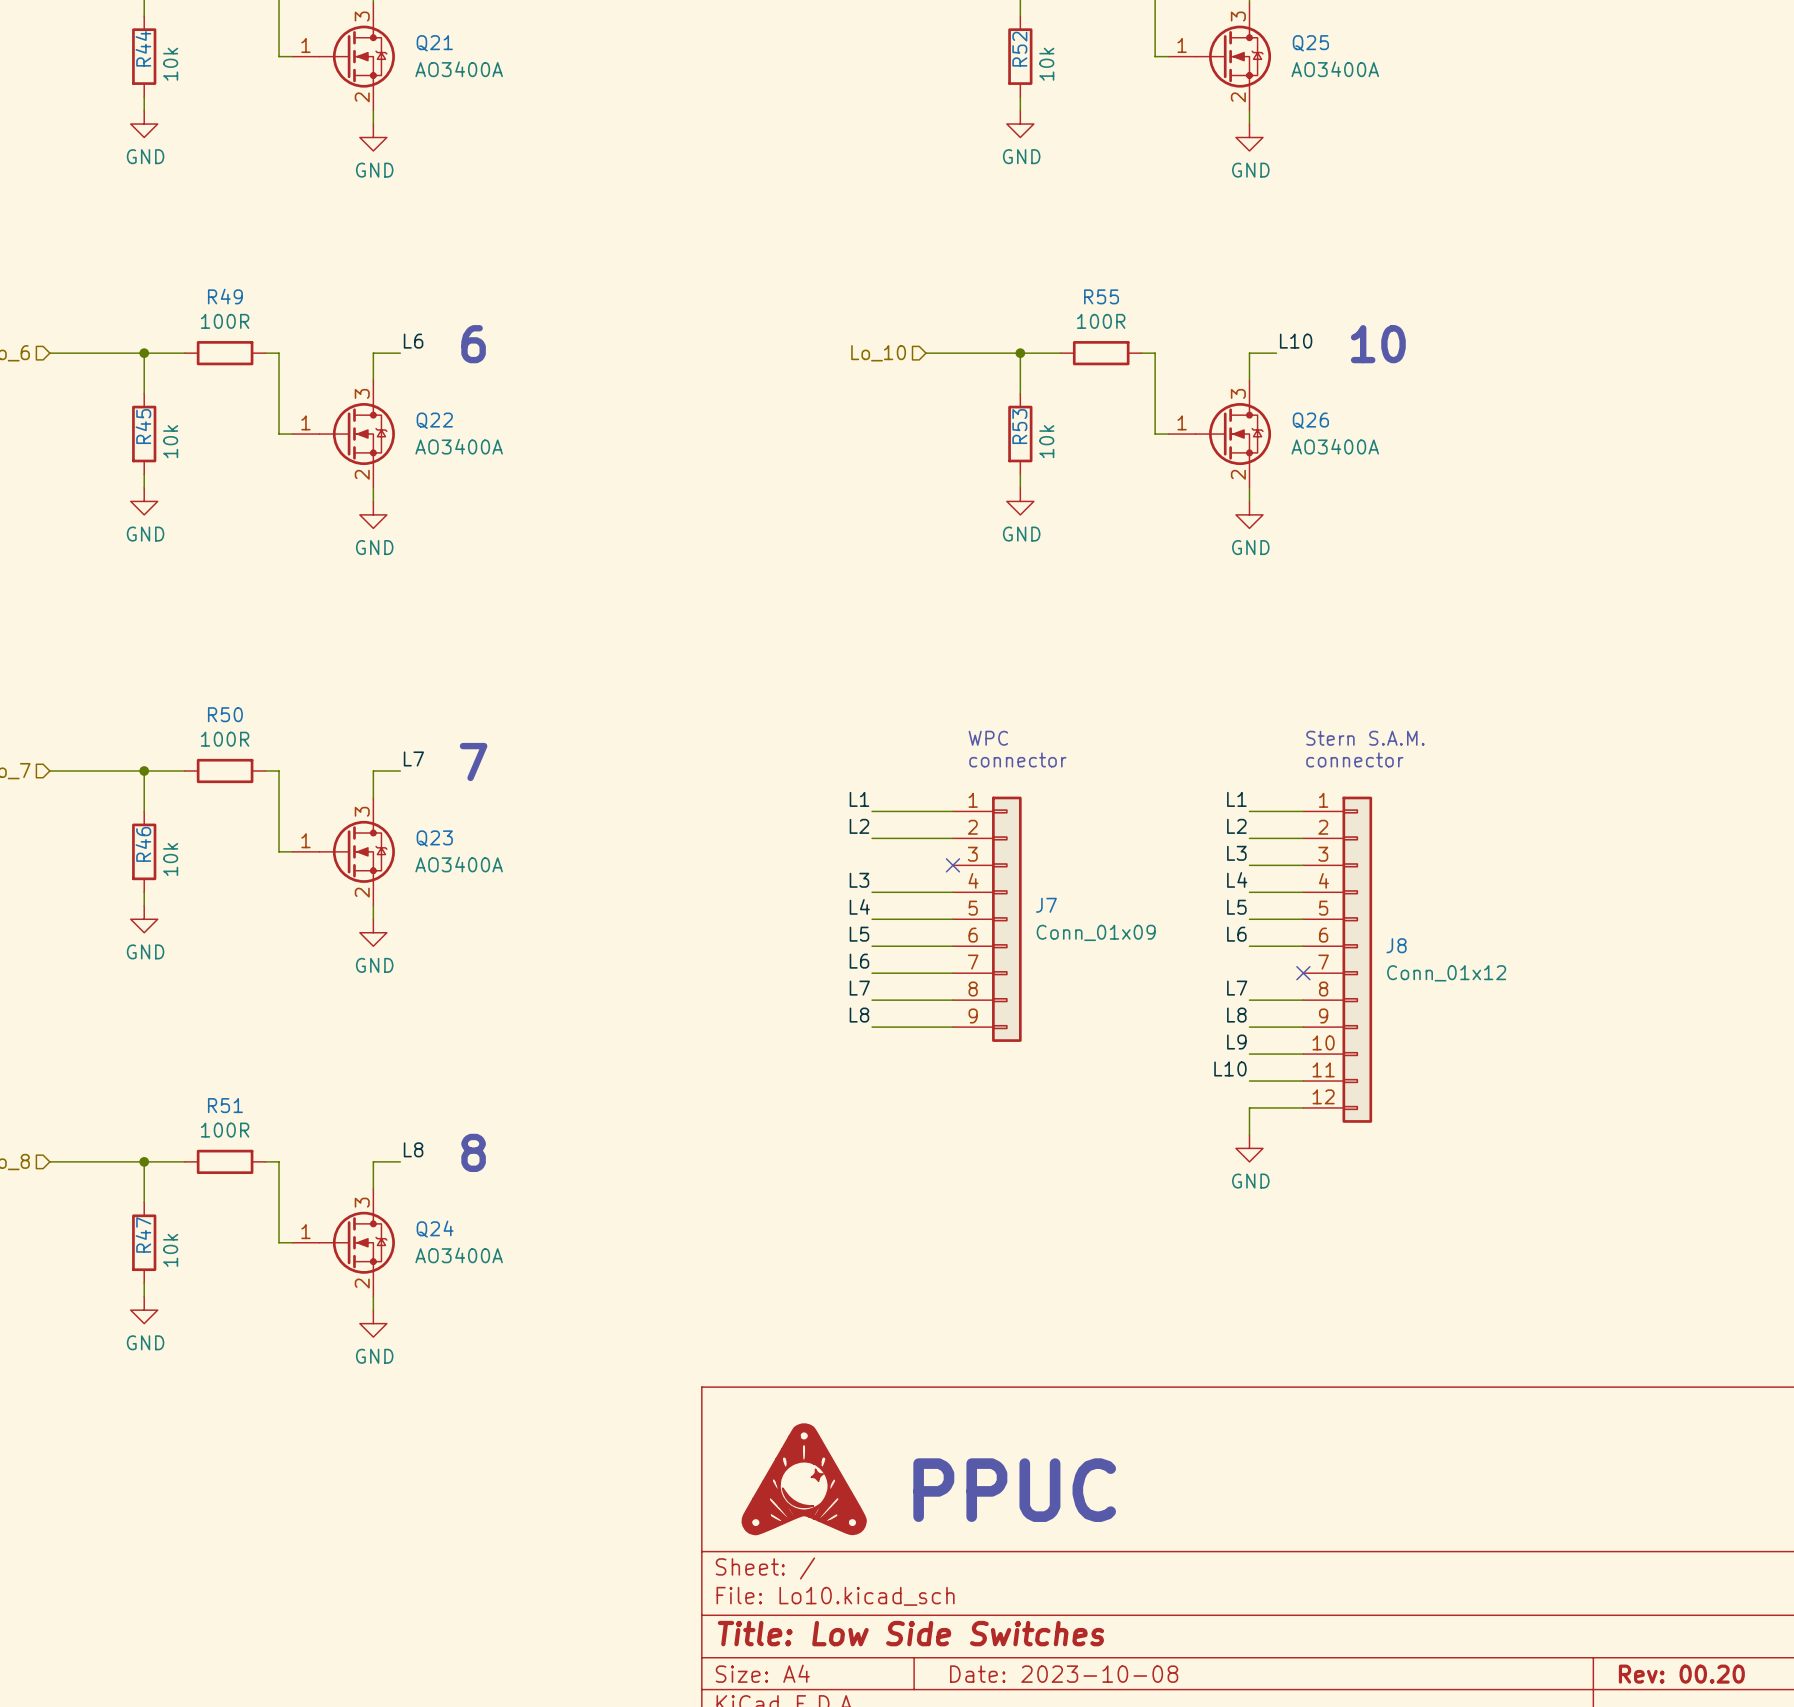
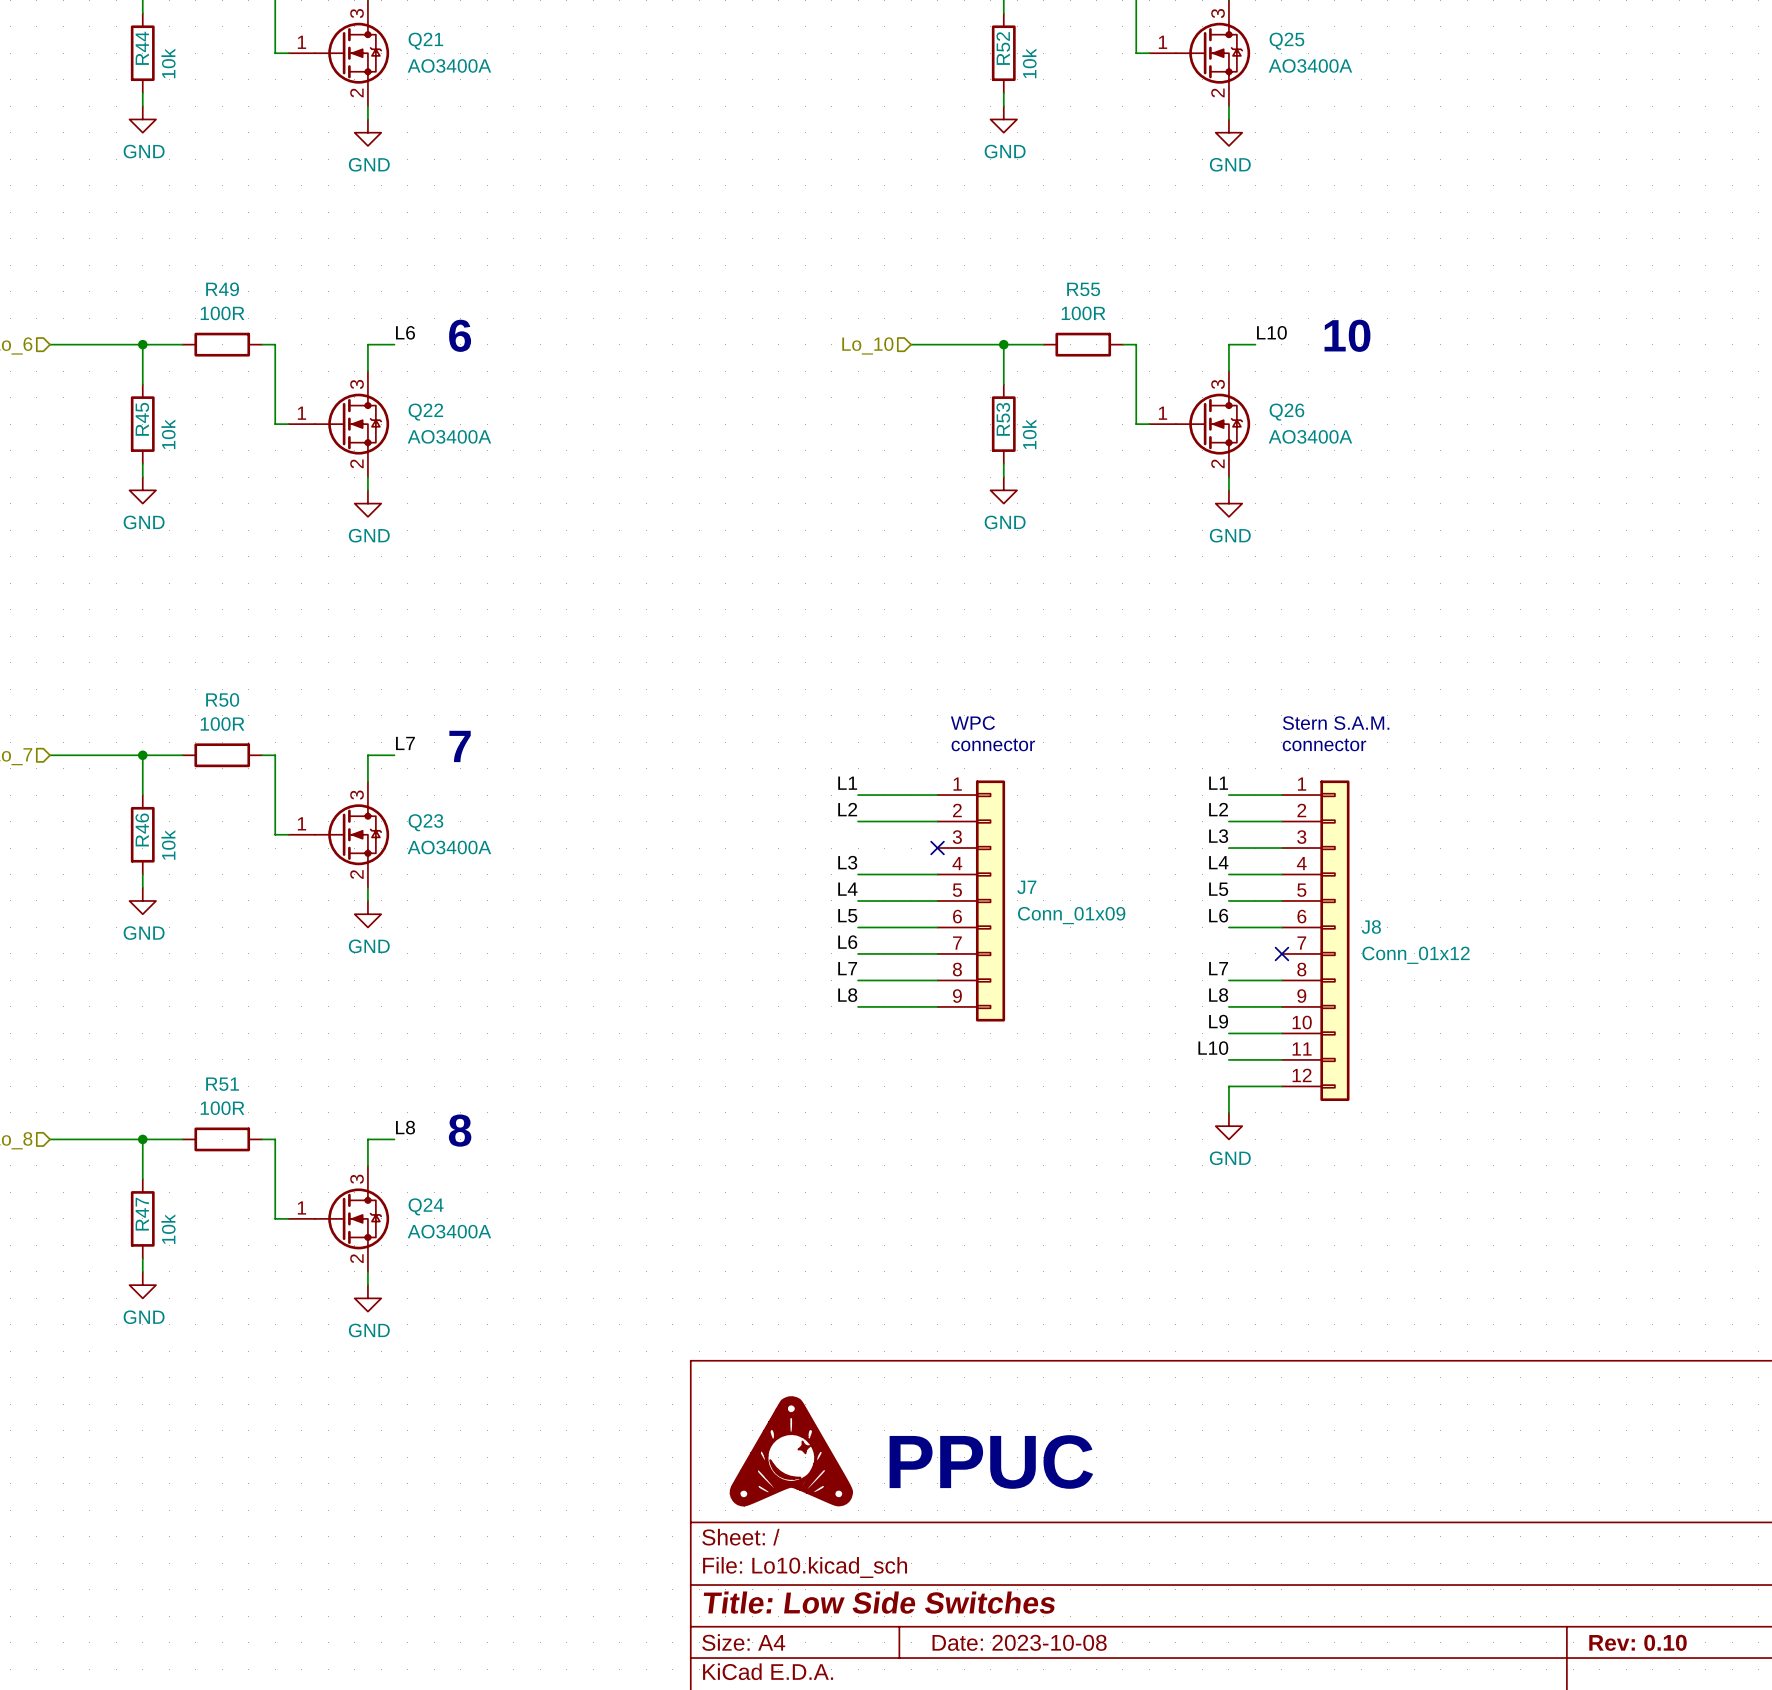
title block: Rev: 00.20 (1681, 1674) -> Rev: 0.10 (1637, 1642)

